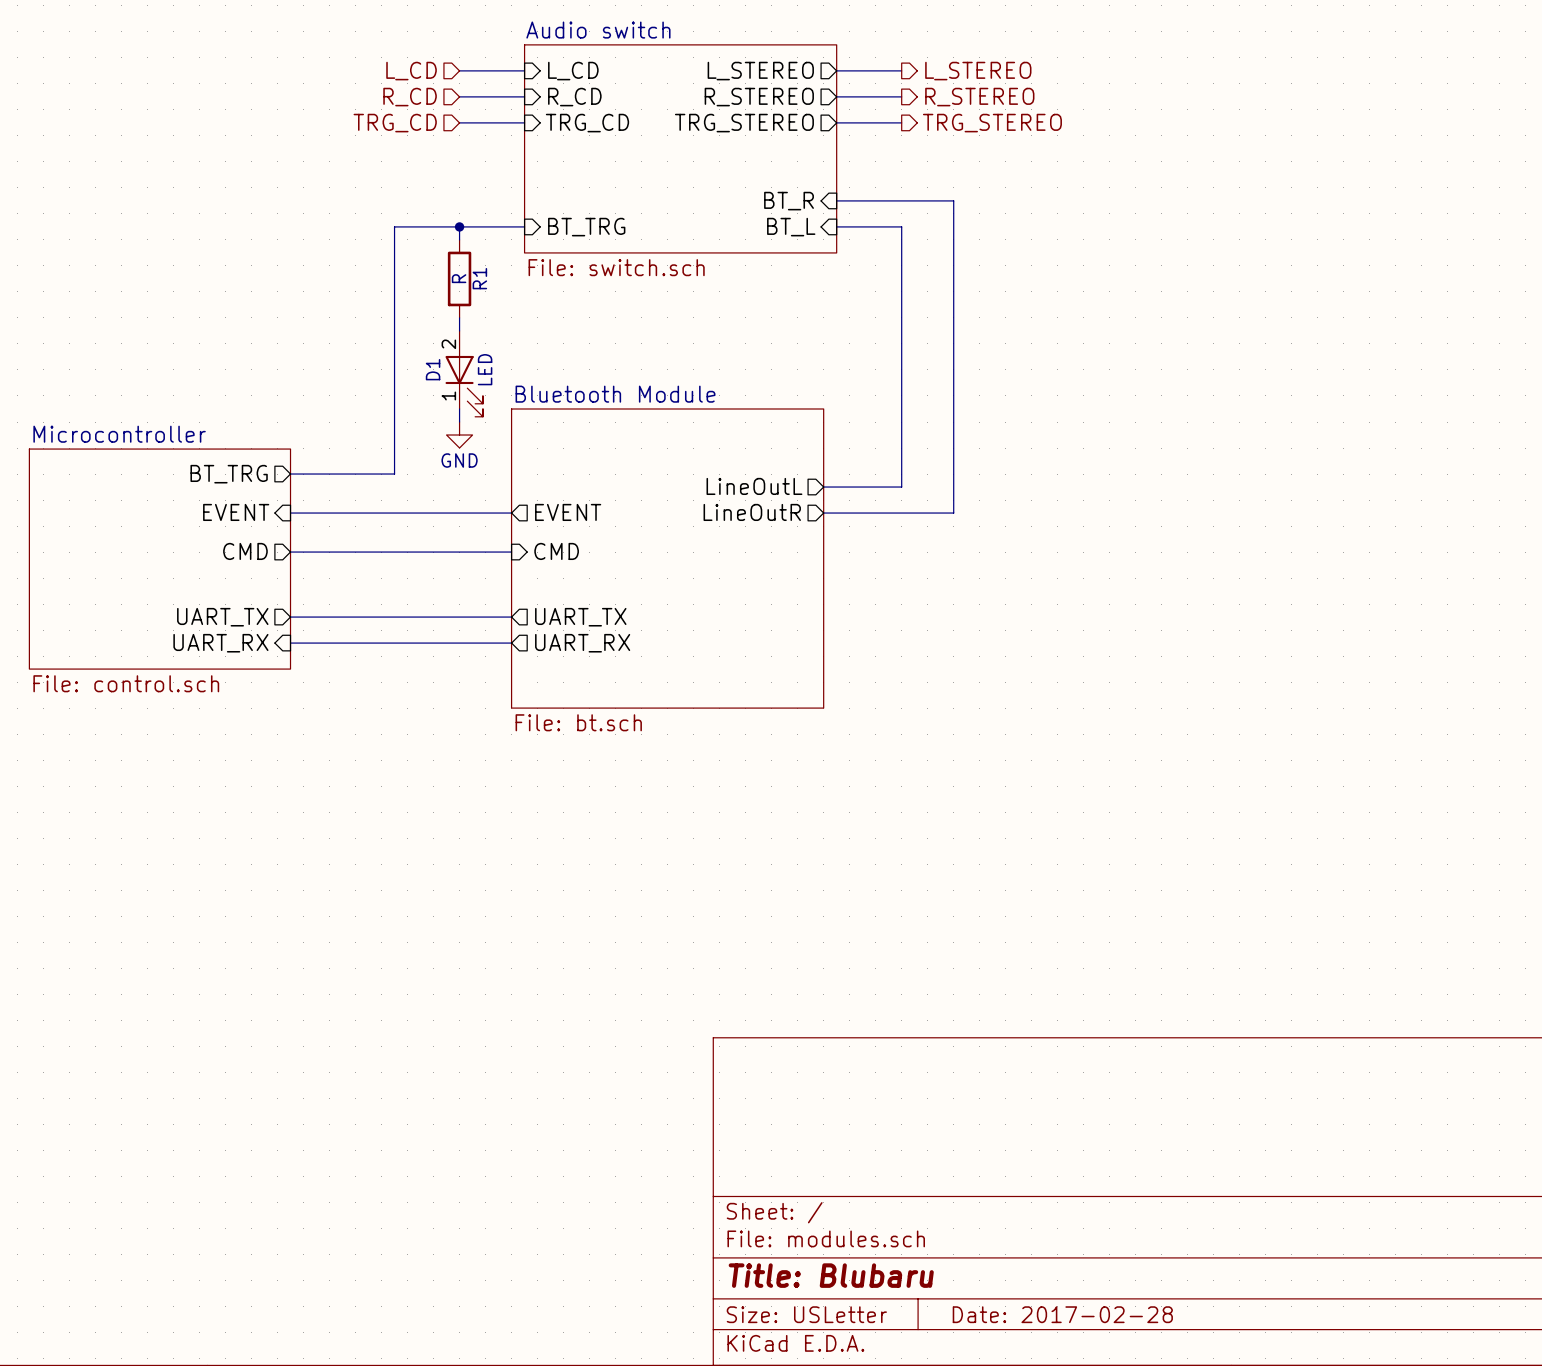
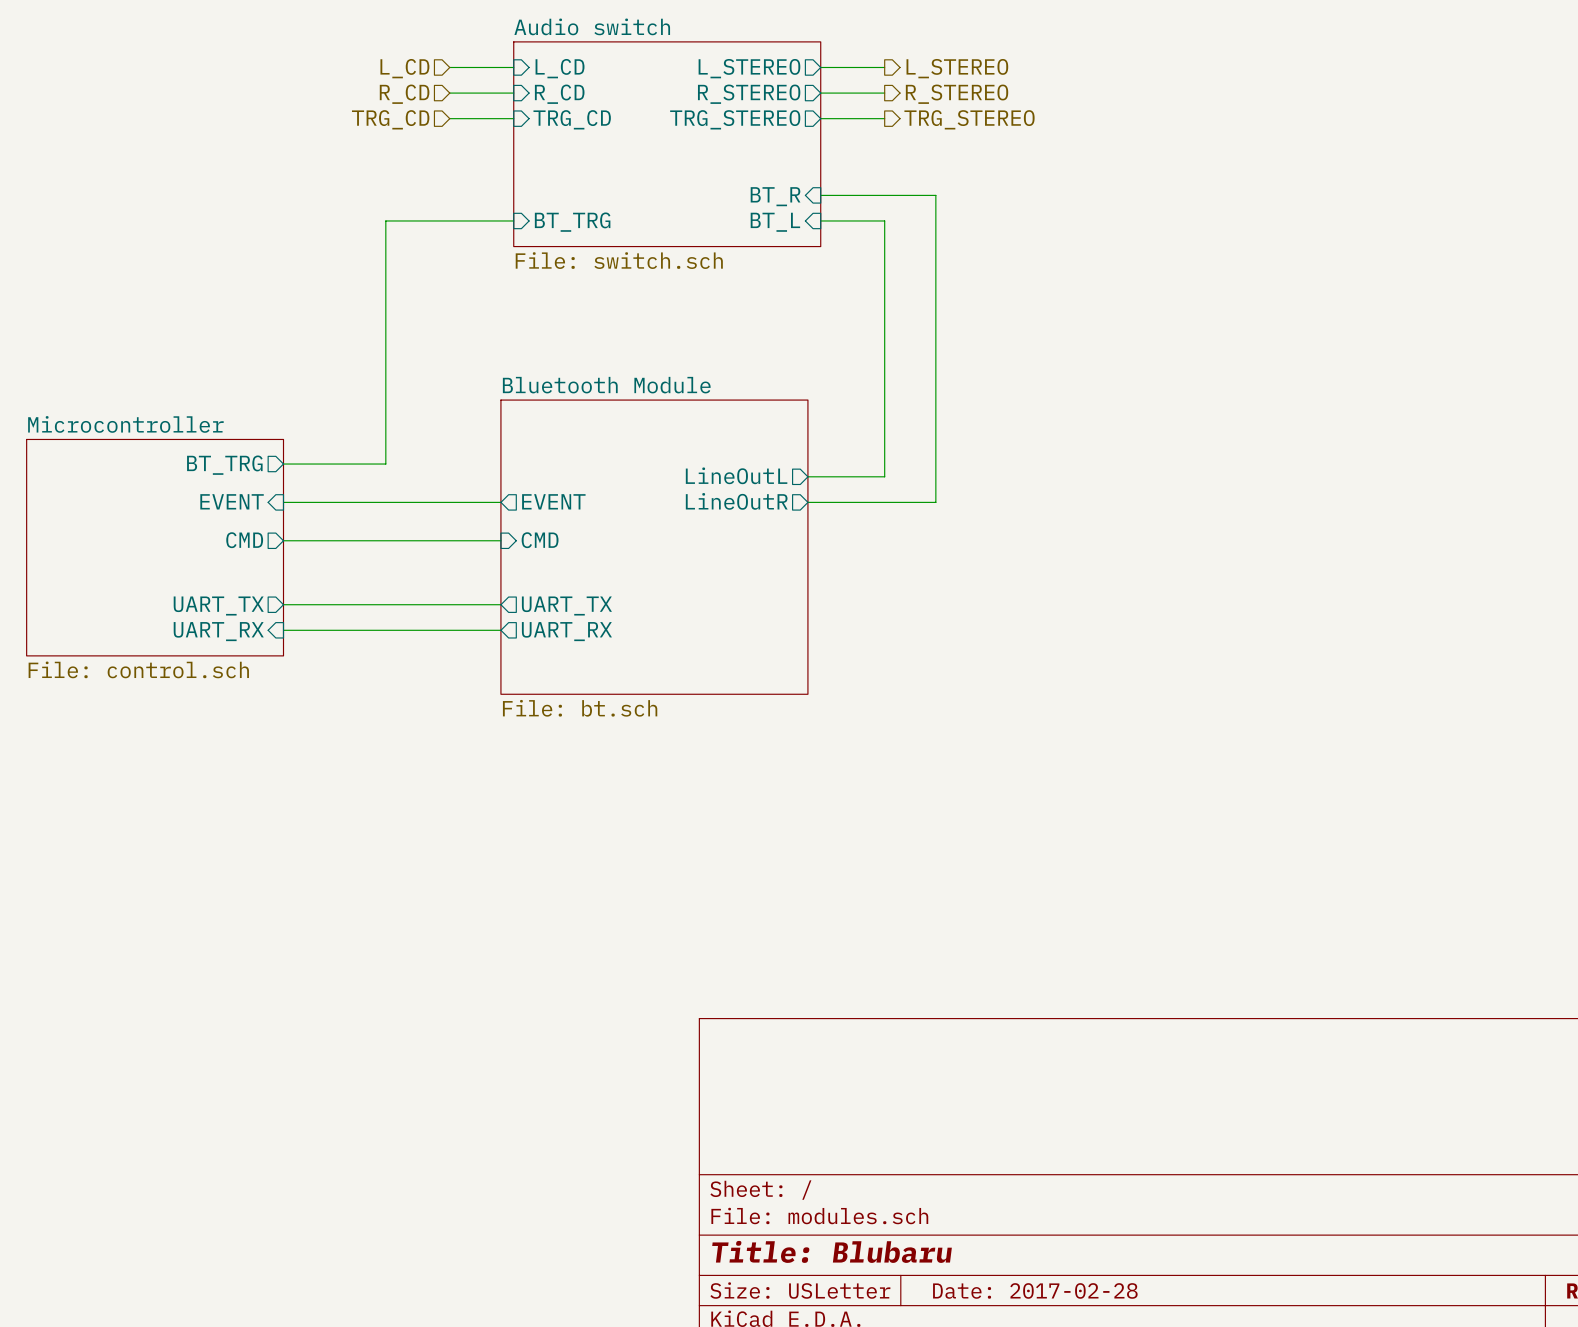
wire: (459, 226) (459, 239) -> none
junction: (459, 226) -> none
R1: R (459, 278) -> none
wire: (459, 317) (459, 330) -> none
D1: LED (464, 373) -> none
wire: (459, 408) (459, 422) -> none
power symbol: GND (459, 435) -> none

